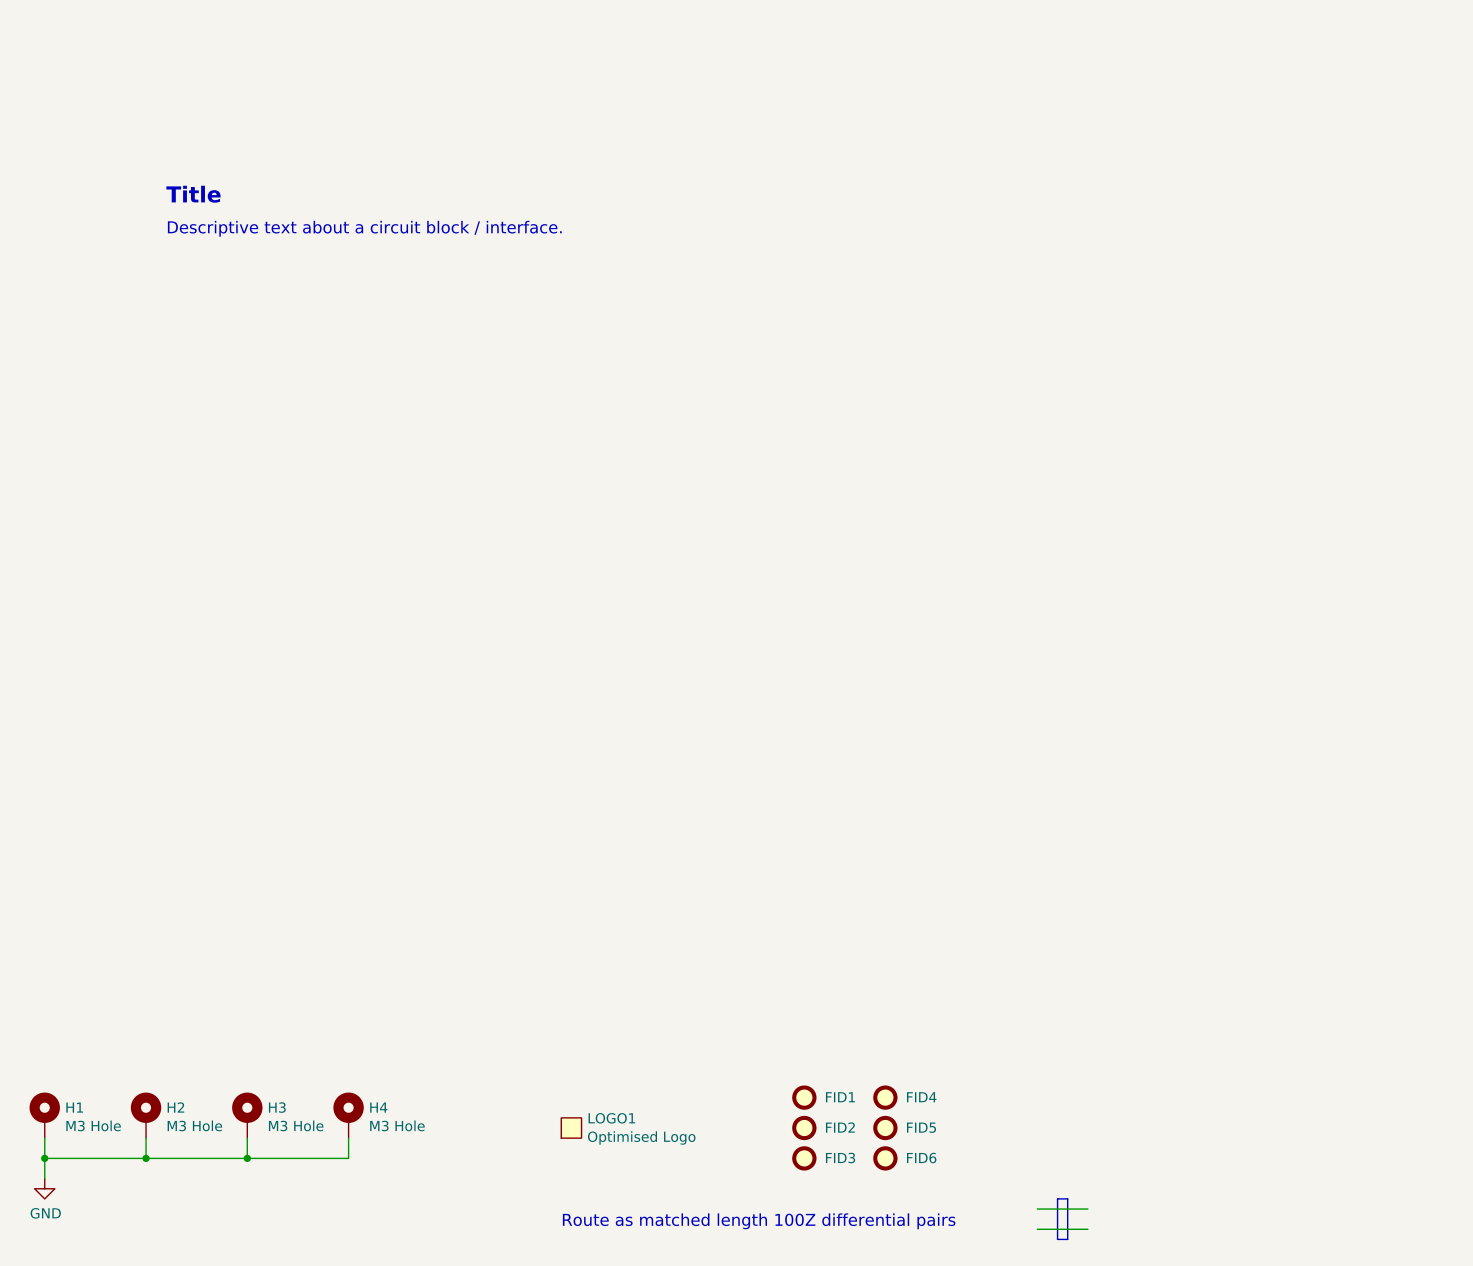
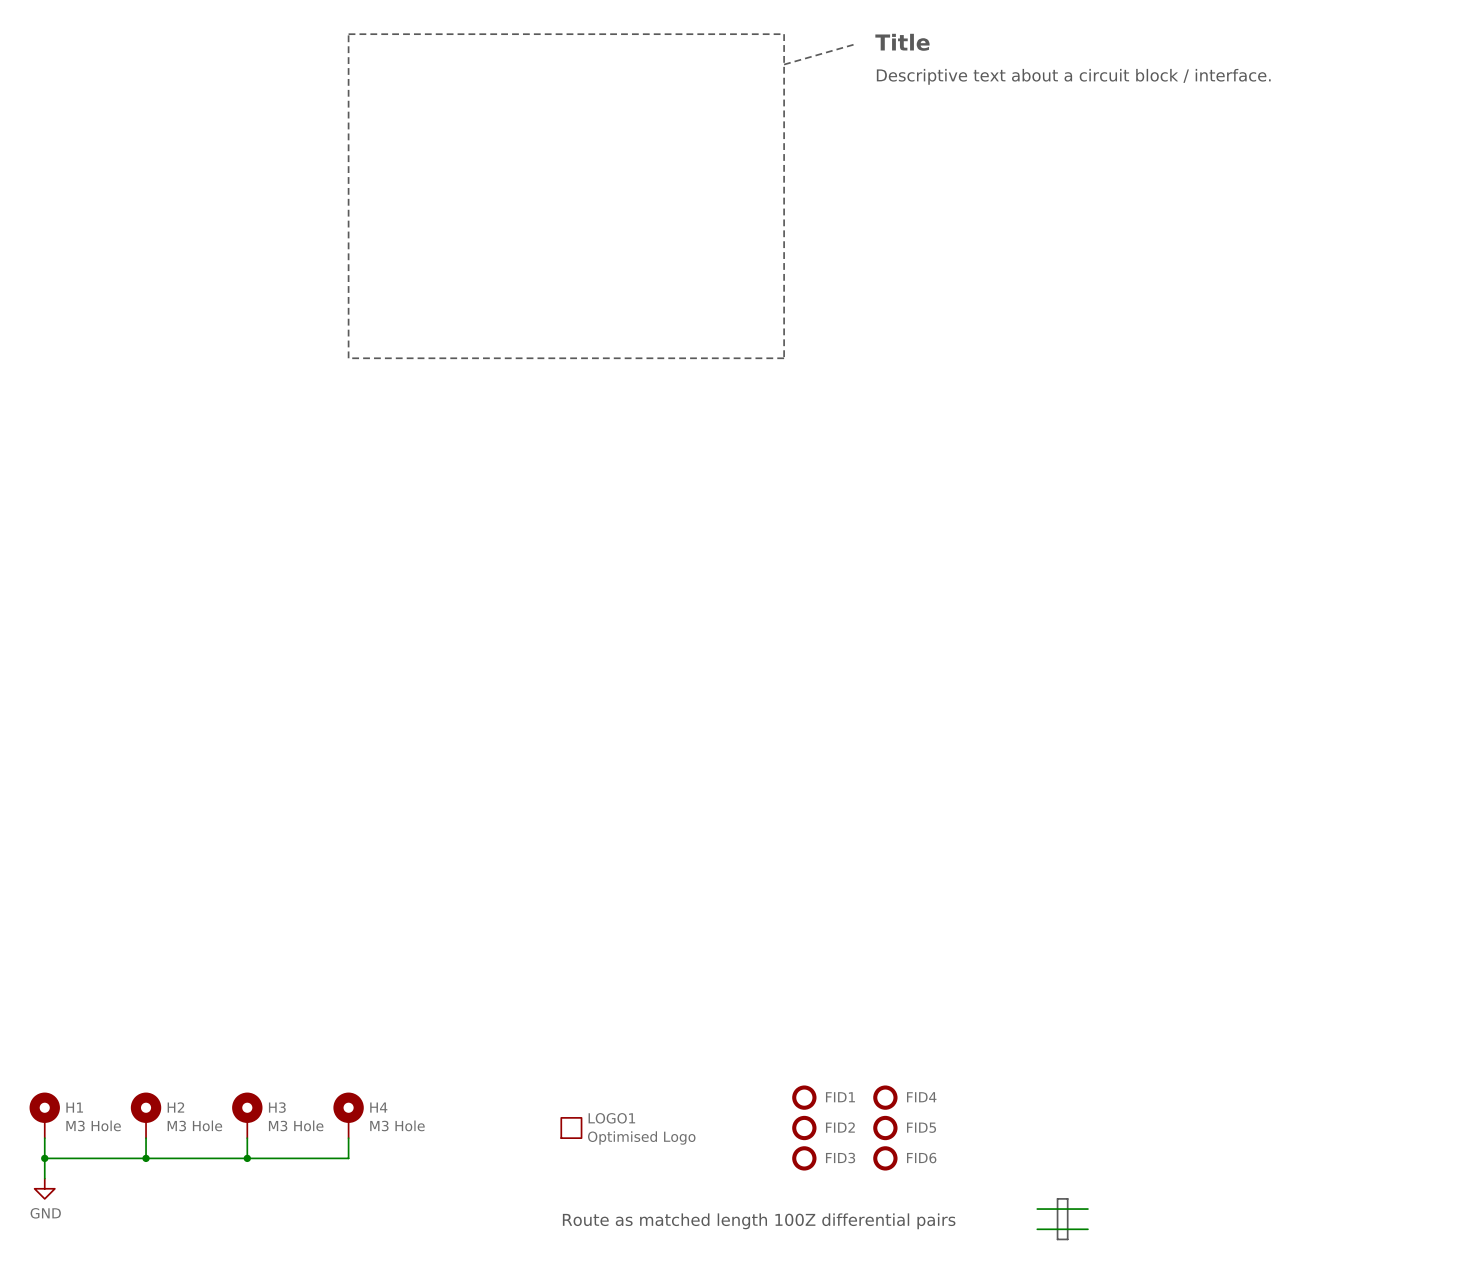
line: none -> (348, 34) (784, 34) (784, 358) (348, 358) (348, 34)
text: none -> Title (902, 42)
line: none -> (854, 44) (784, 64)
text: none -> Descriptive text about a circuit block / interface. (1073, 76)
text: Title (193, 194) -> none
text: Descriptive text about a circuit block / interface. (364, 228) -> none

